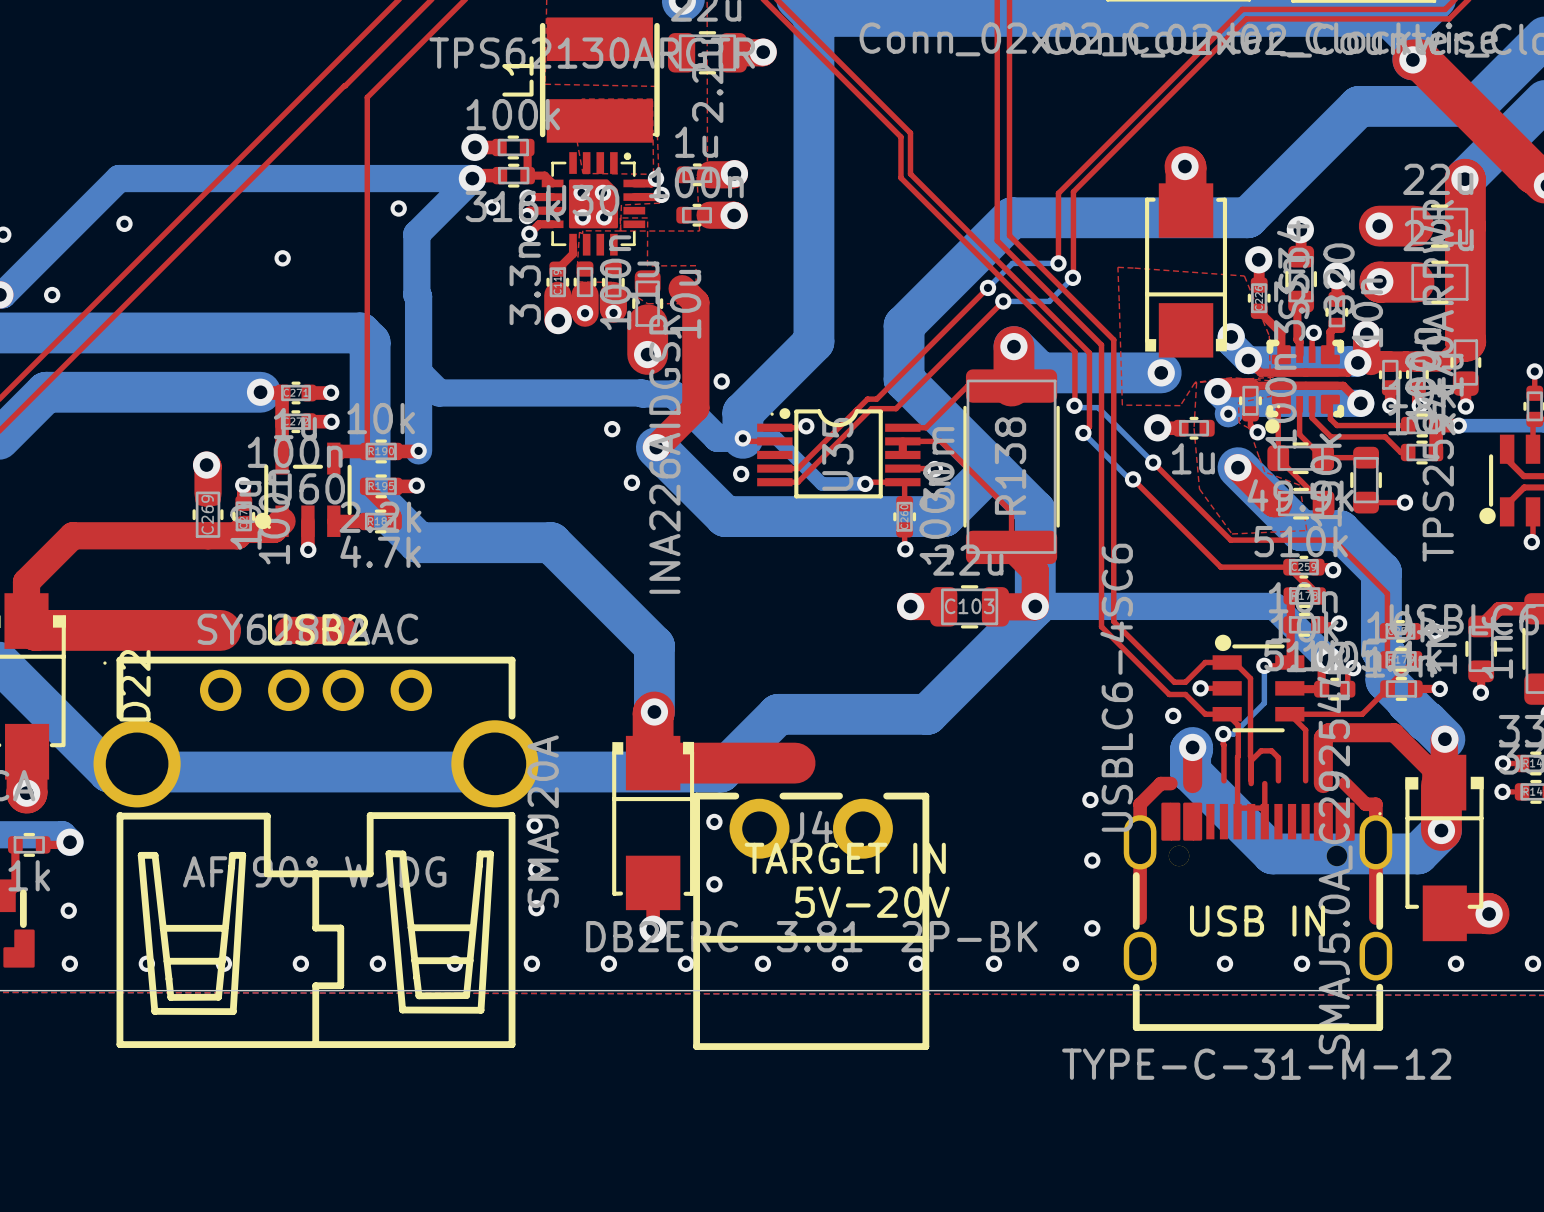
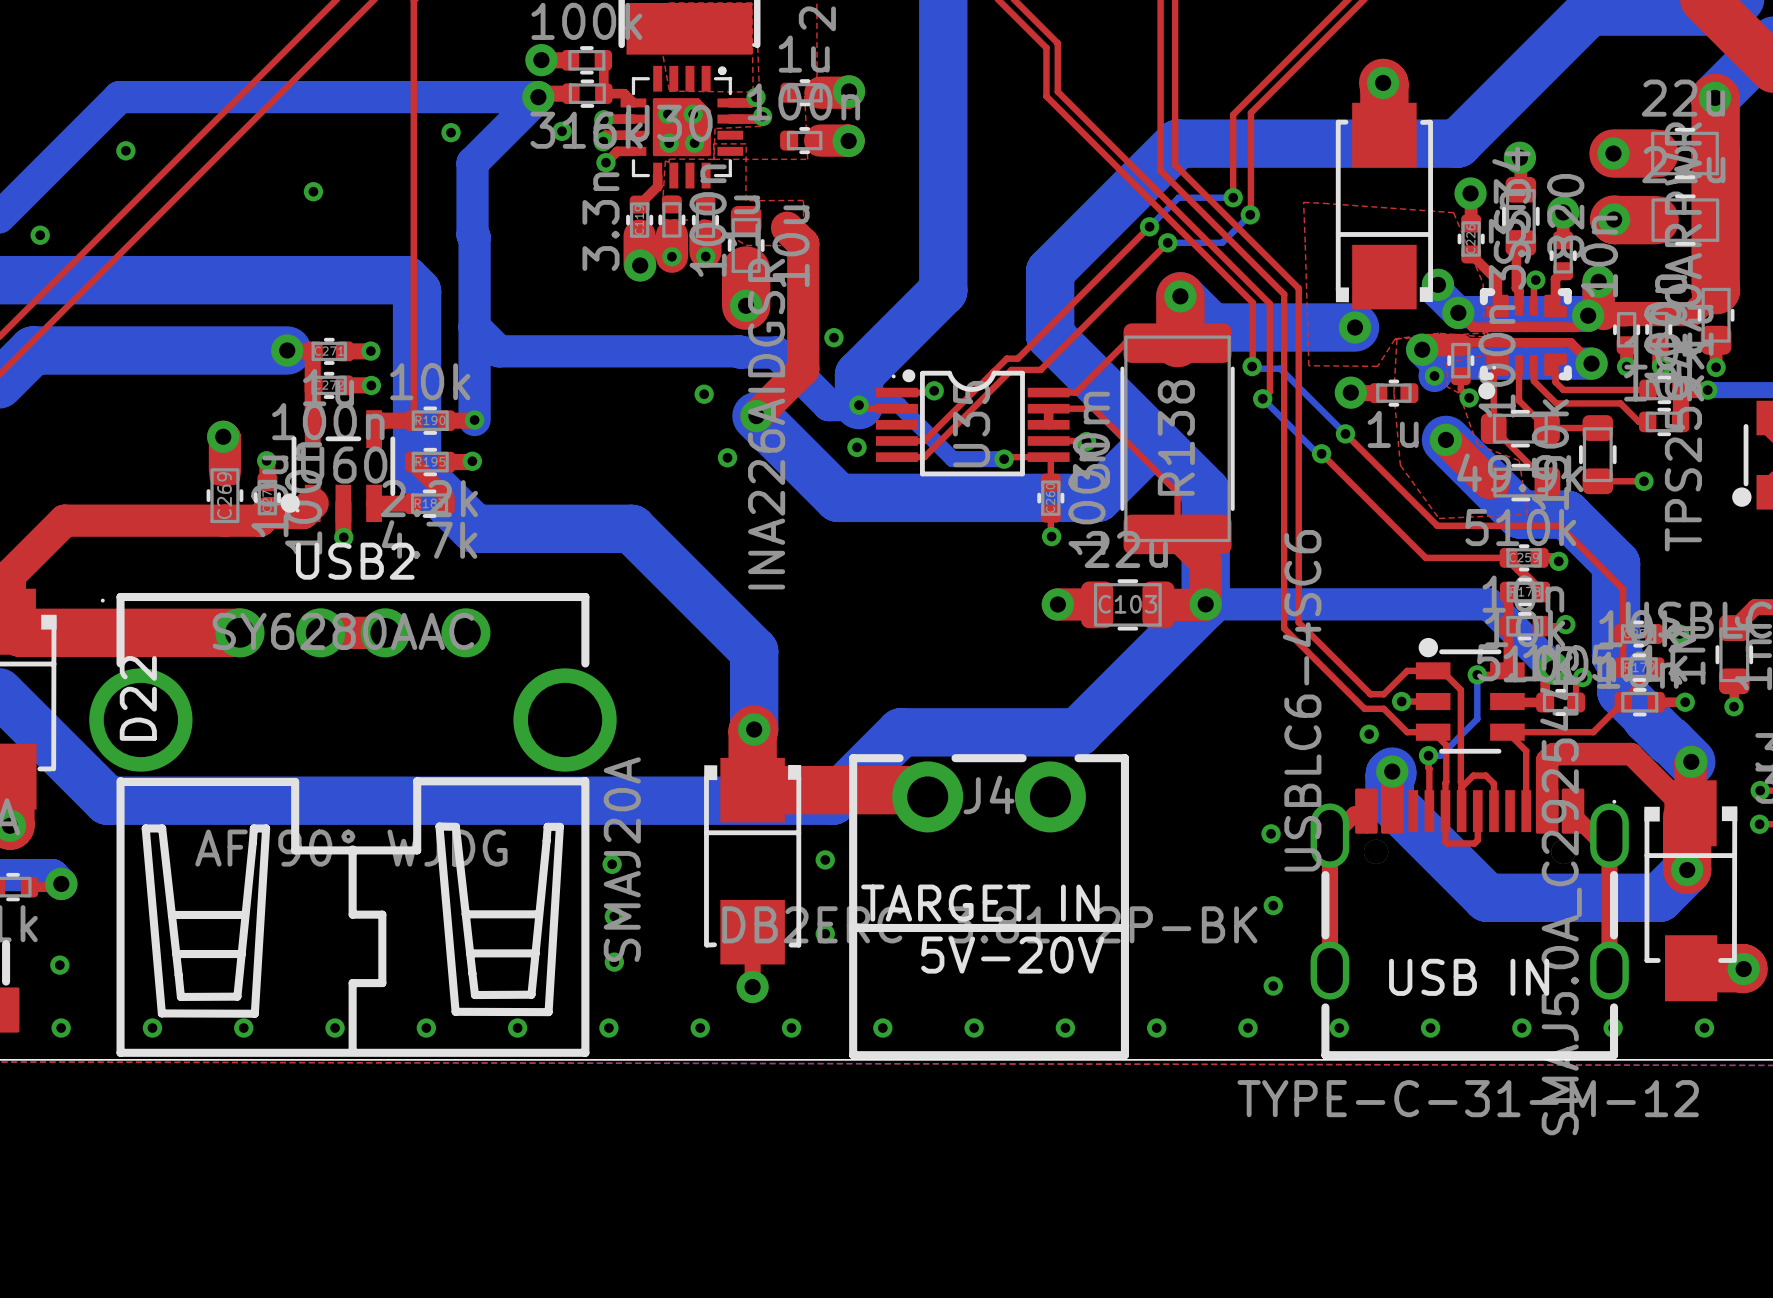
USB2 position: (315, 852) -> (352, 824)
part position: (1258, 916) -> (1469, 923)
J4 position: (811, 921) -> (989, 906)

